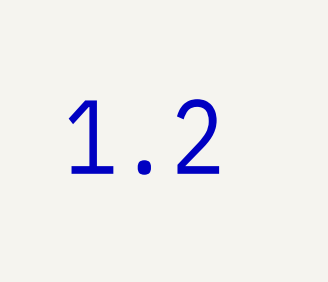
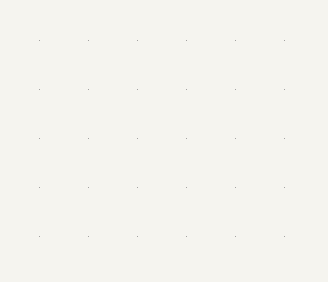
text: 1.2 (143, 136) -> none

